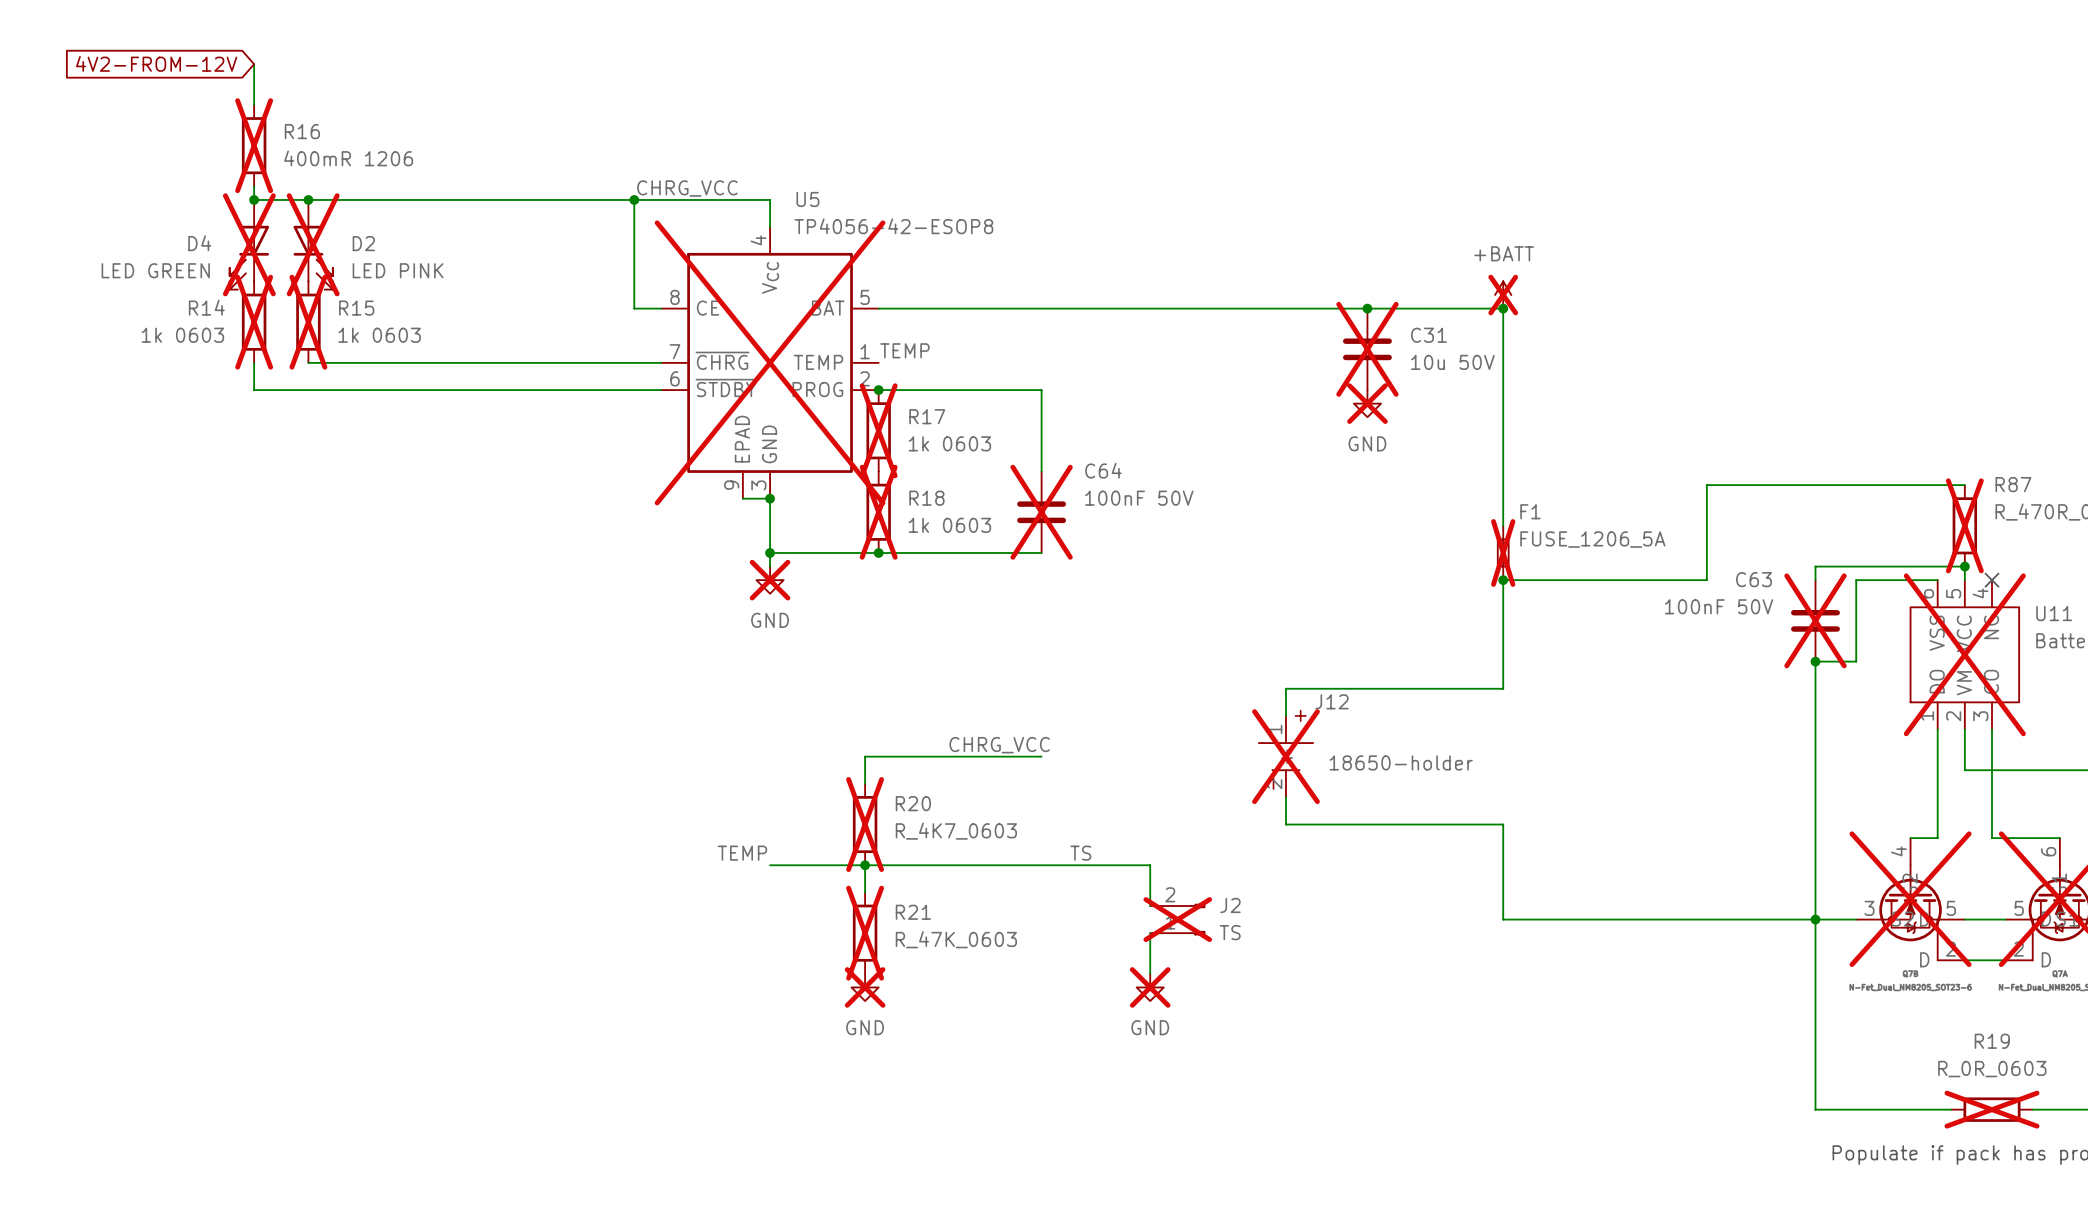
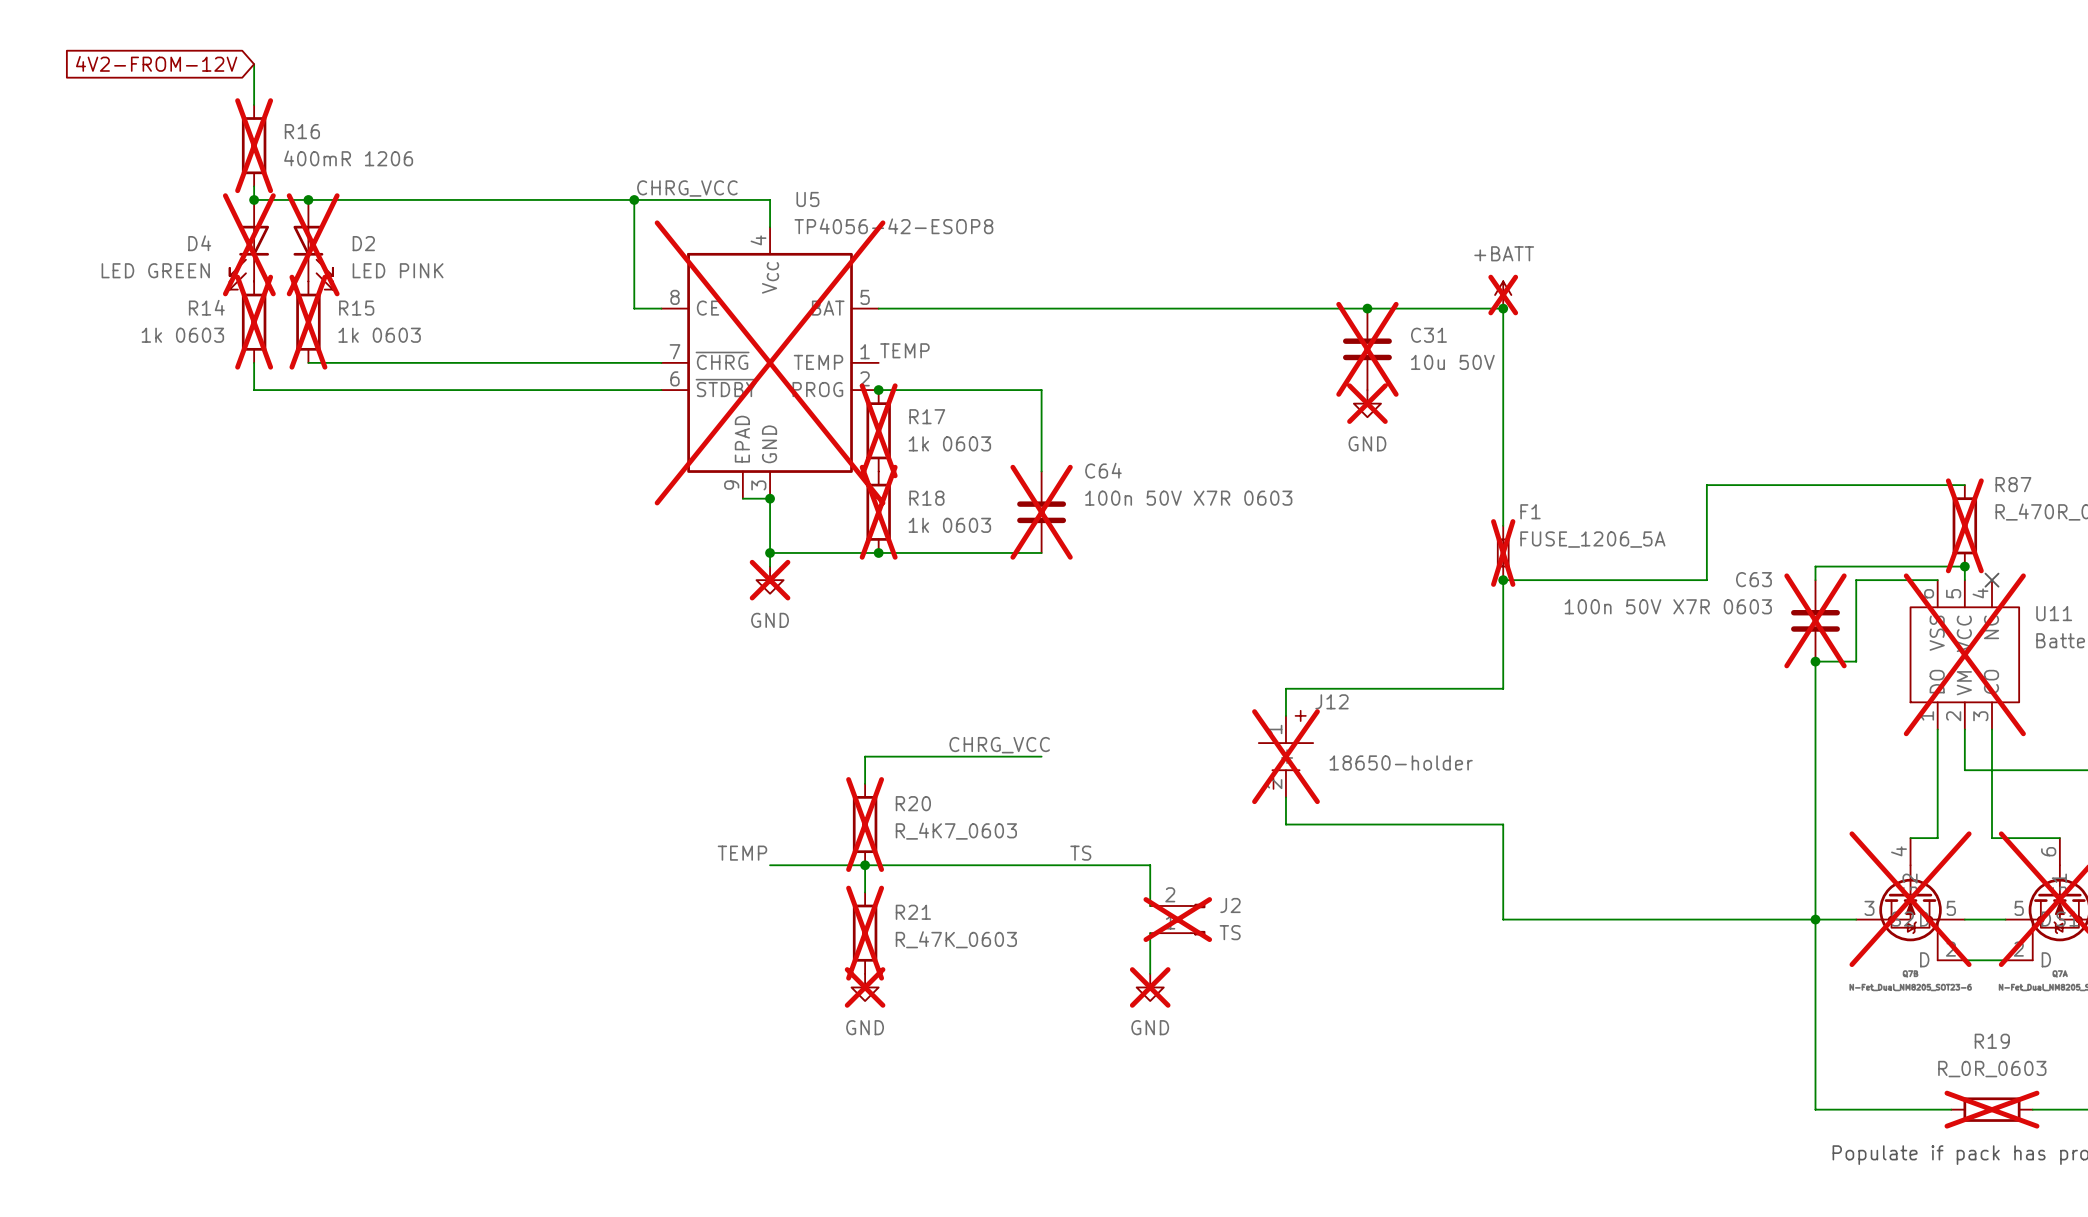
C64 value: 100nF 50V (1139, 498) -> 100n 50V X7R 0603 (1188, 498)
C63 value: 100nF 50V (1719, 606) -> 100n 50V X7R 0603 (1668, 606)

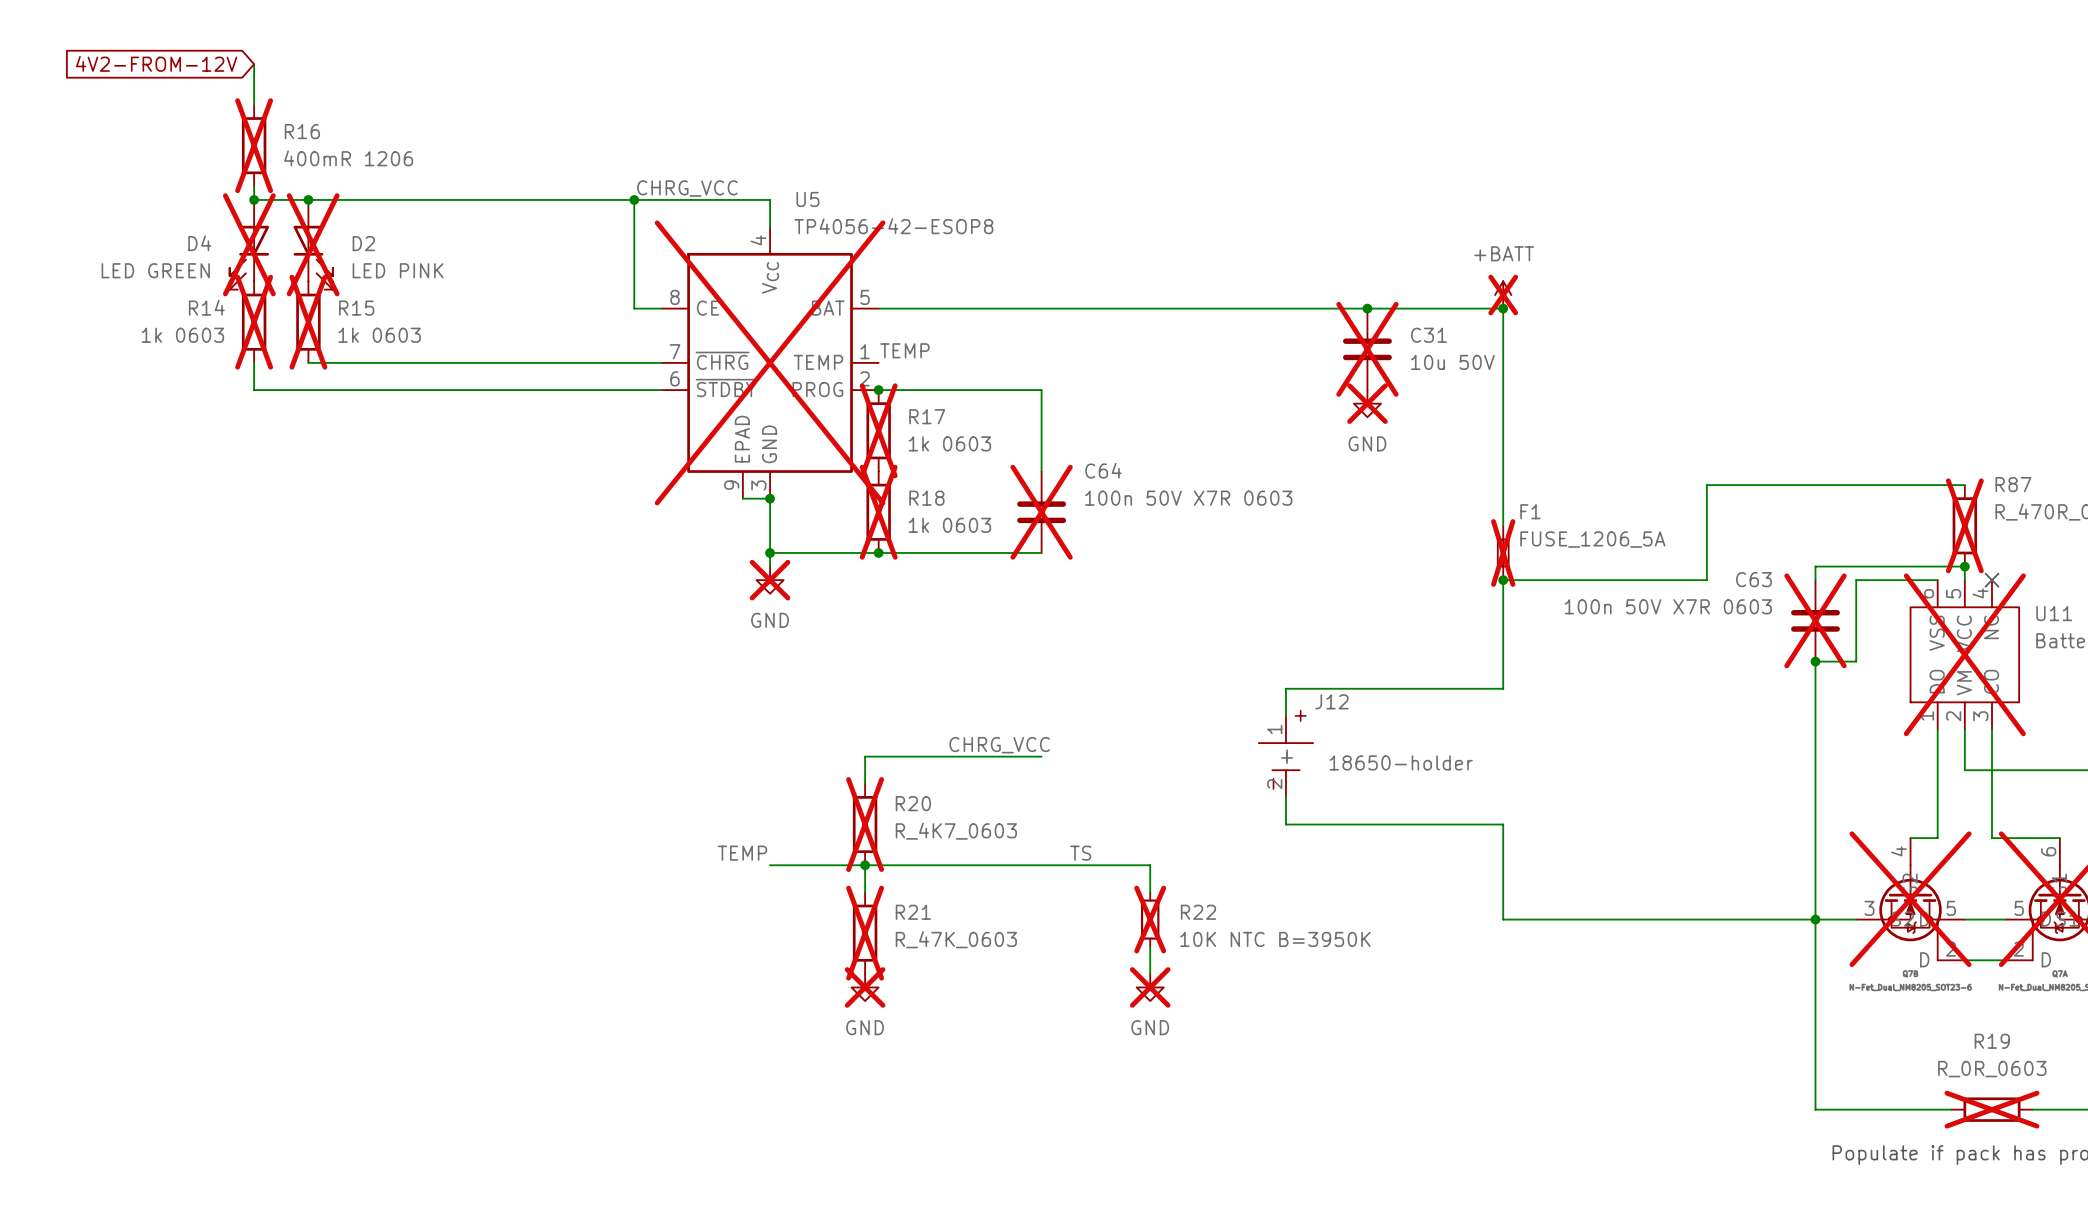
J12 do-not-place cross: (1285, 756) -> none
R22: none -> 10K NTC B=3950K (1150, 919)
J2: TS (1177, 919) -> none

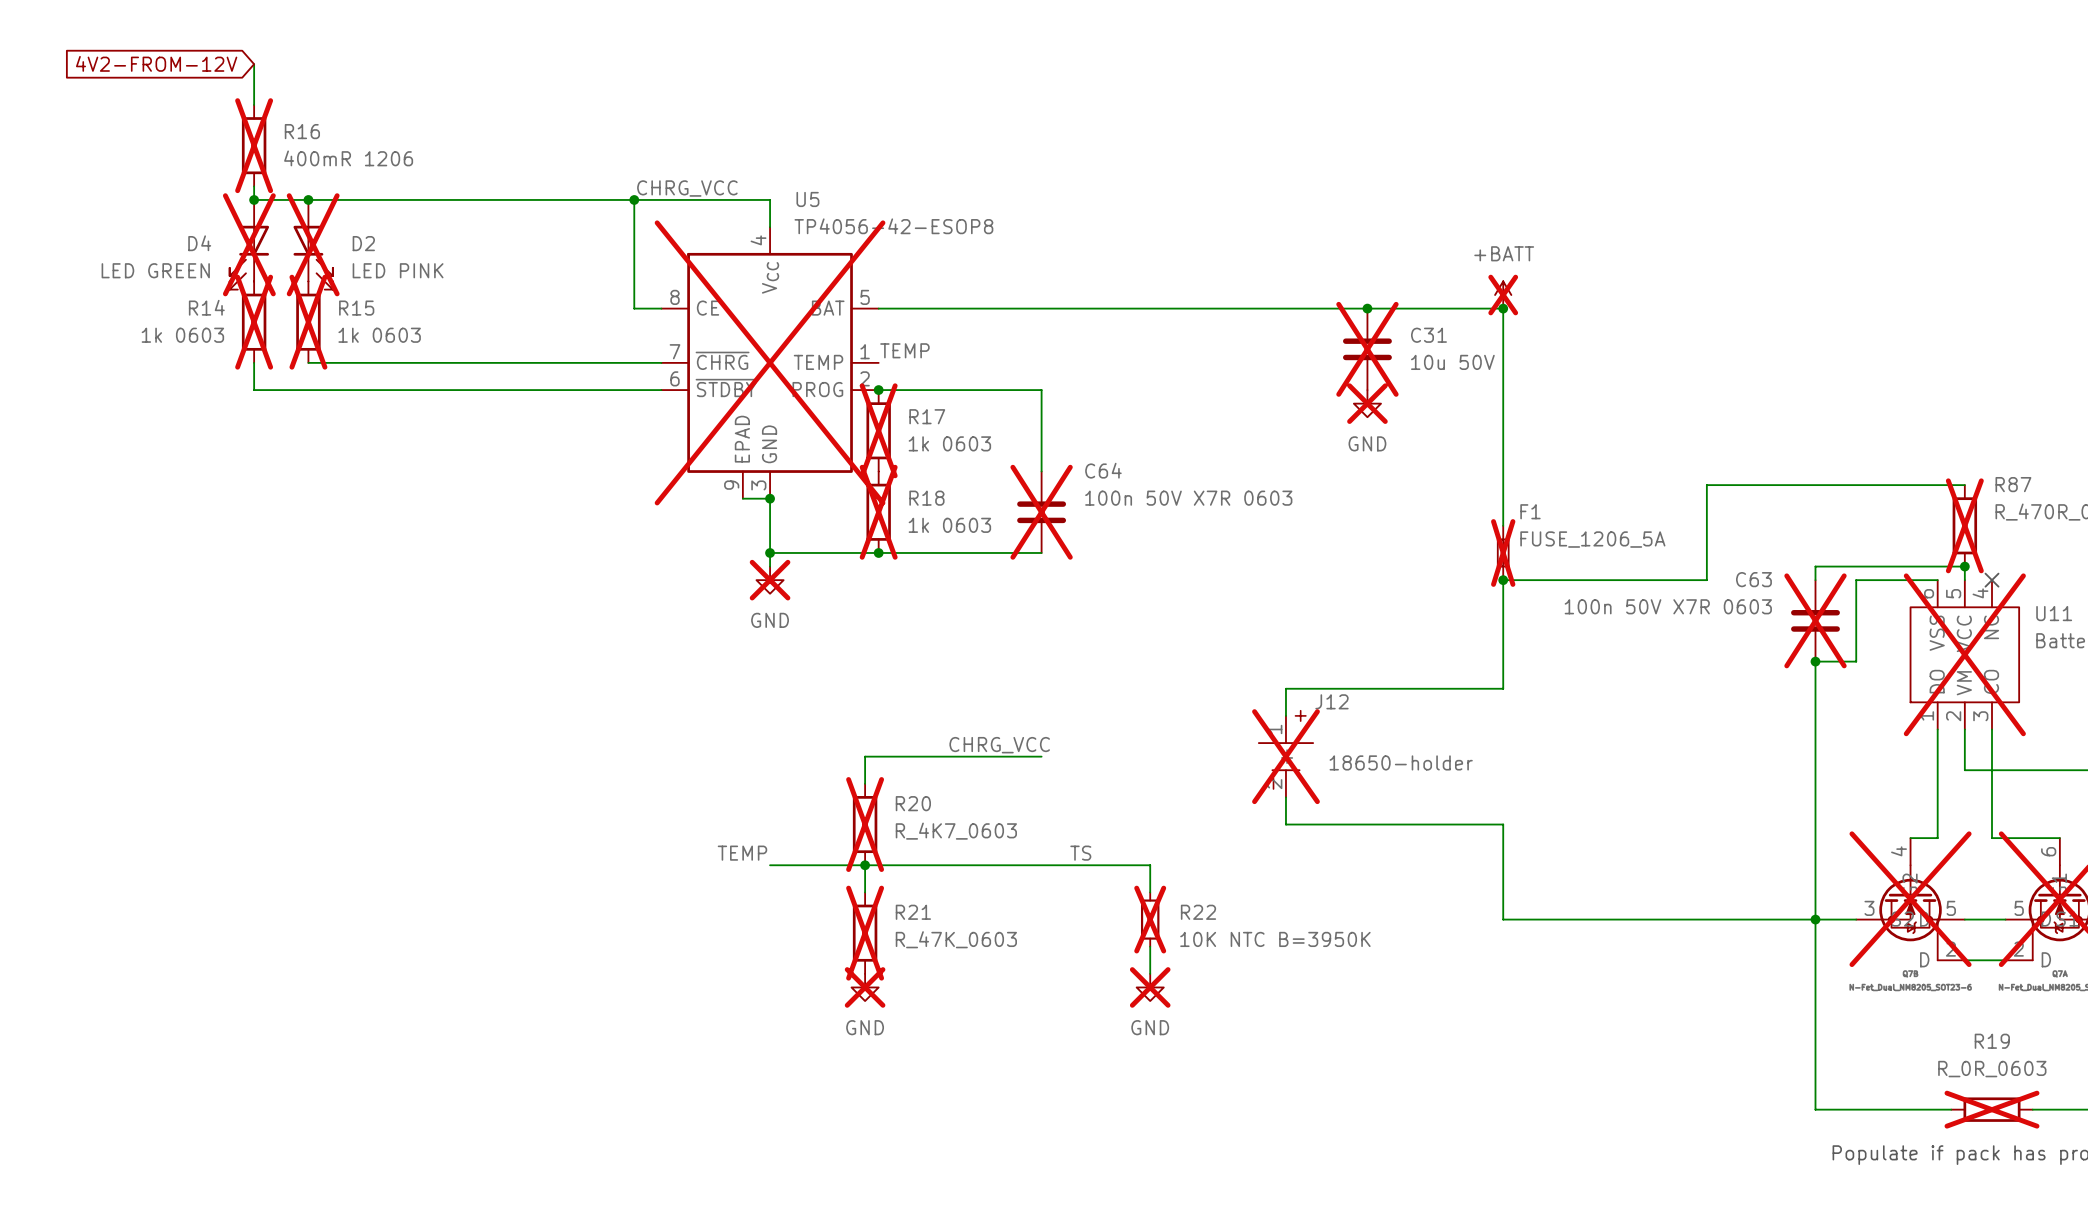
J12 do-not-place cross: none -> (1285, 756)

